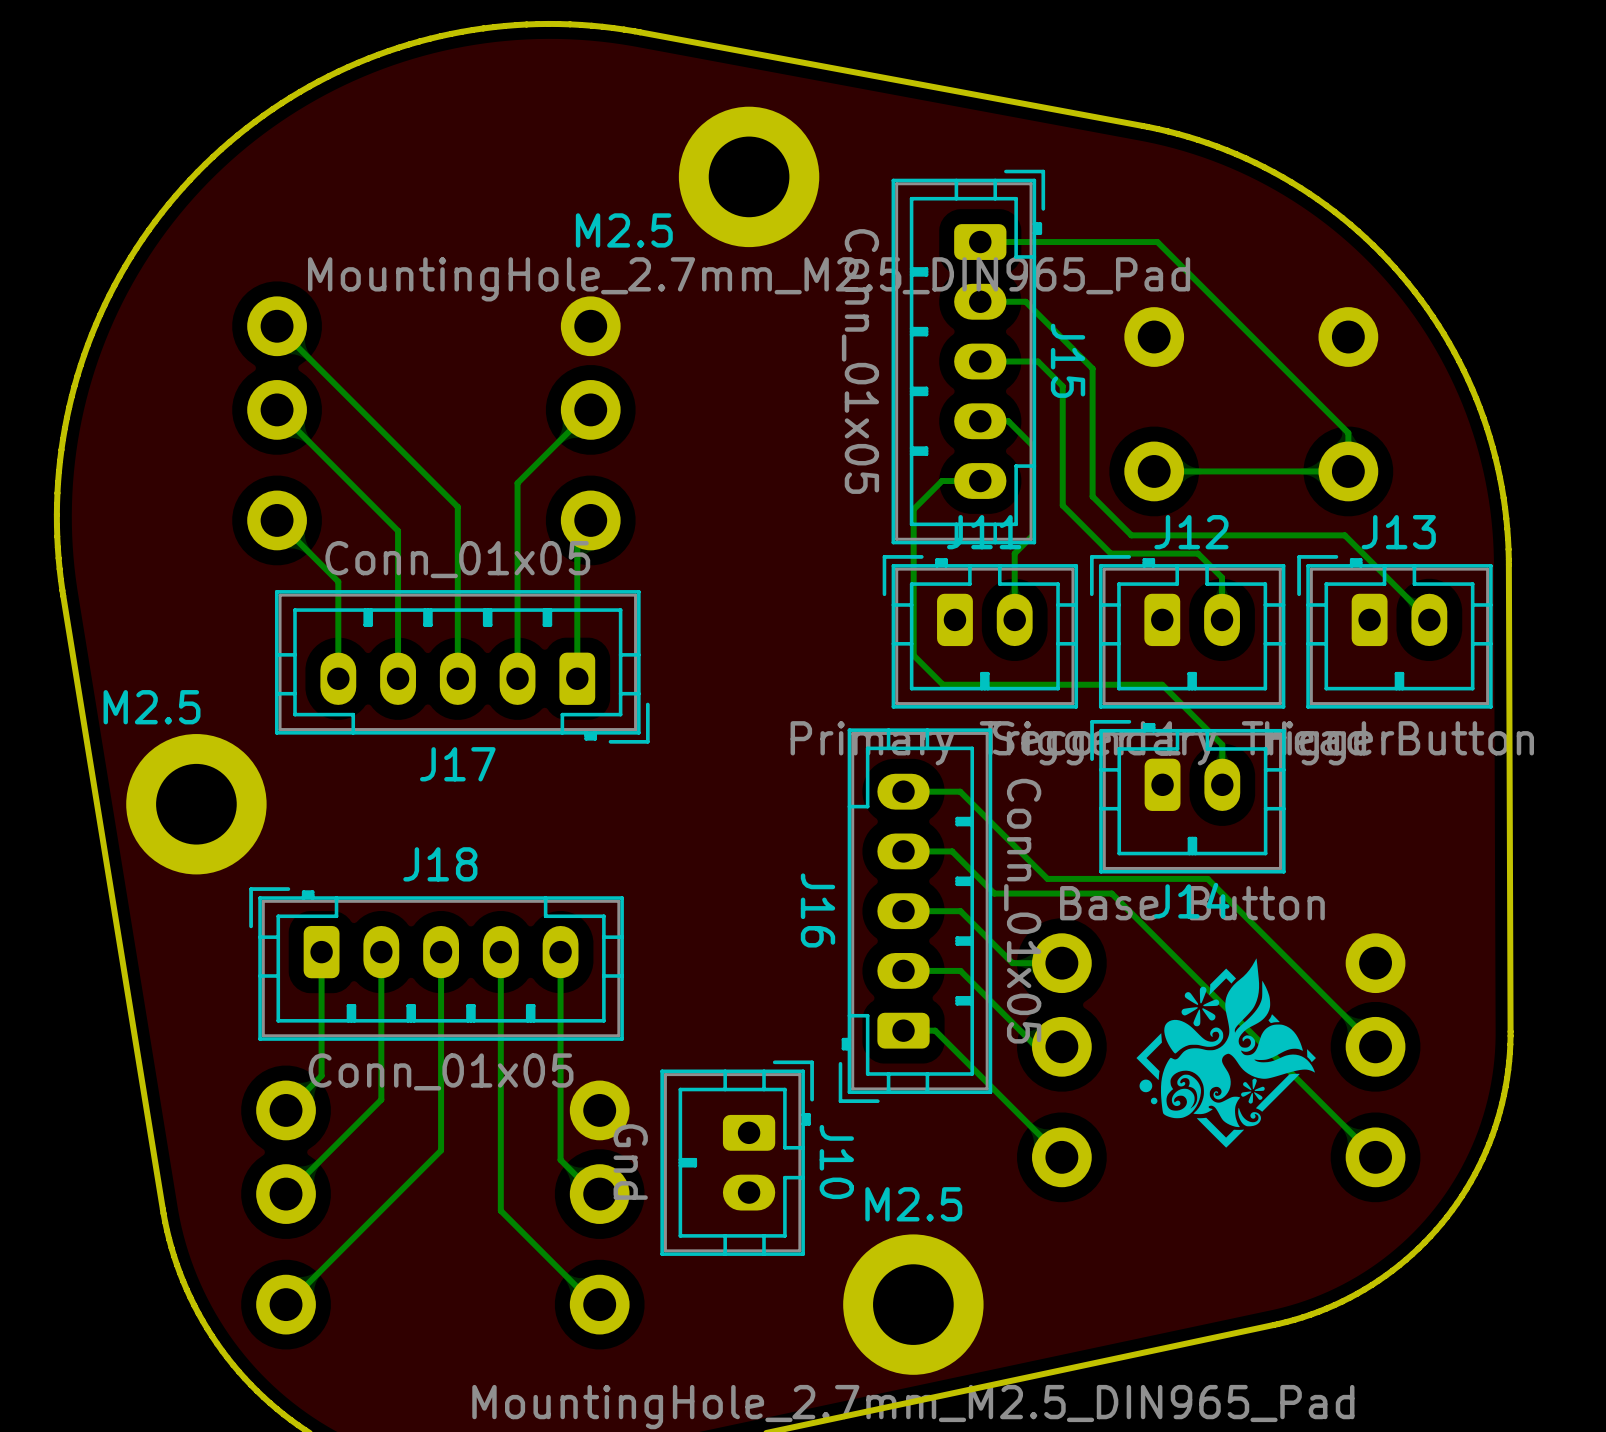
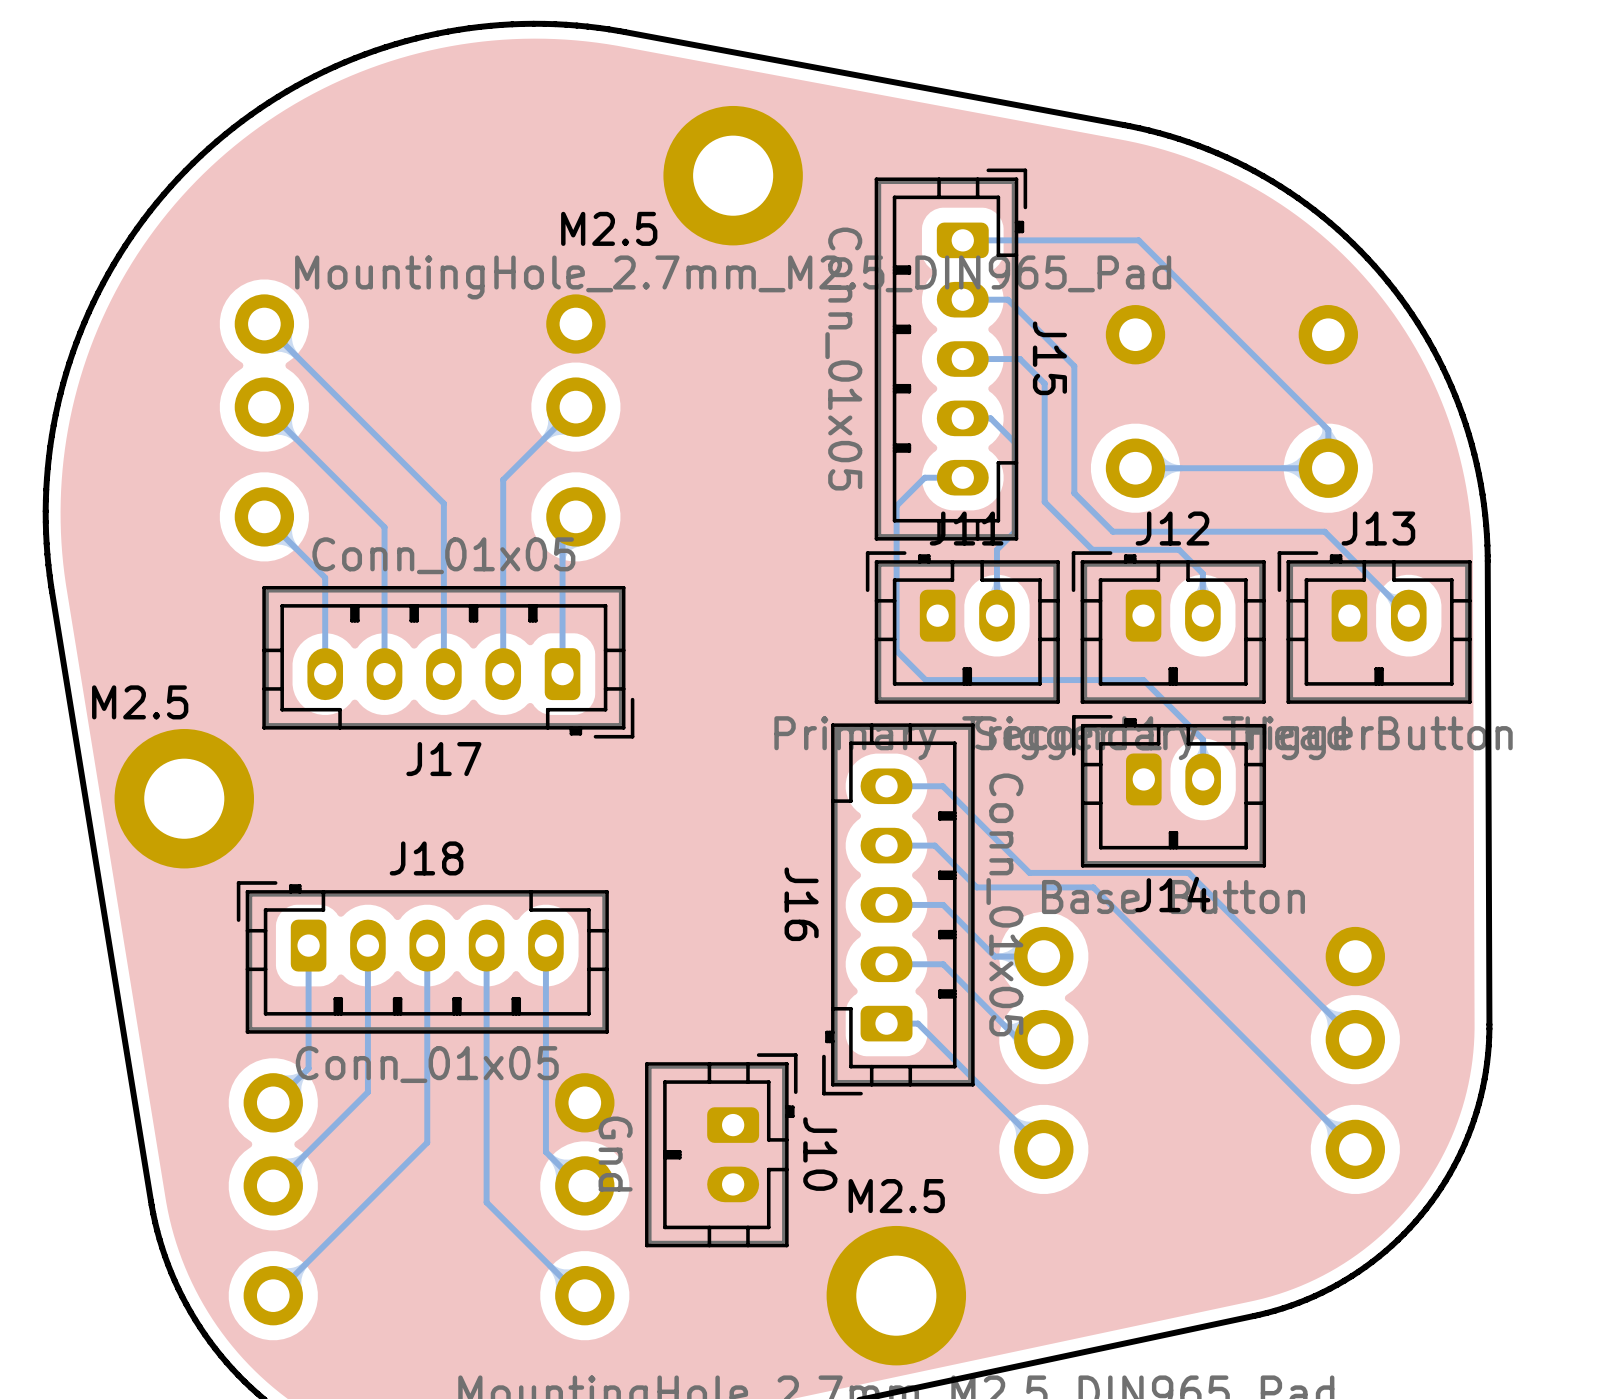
drawing: [1136, 958, 1316, 1148] -> none

